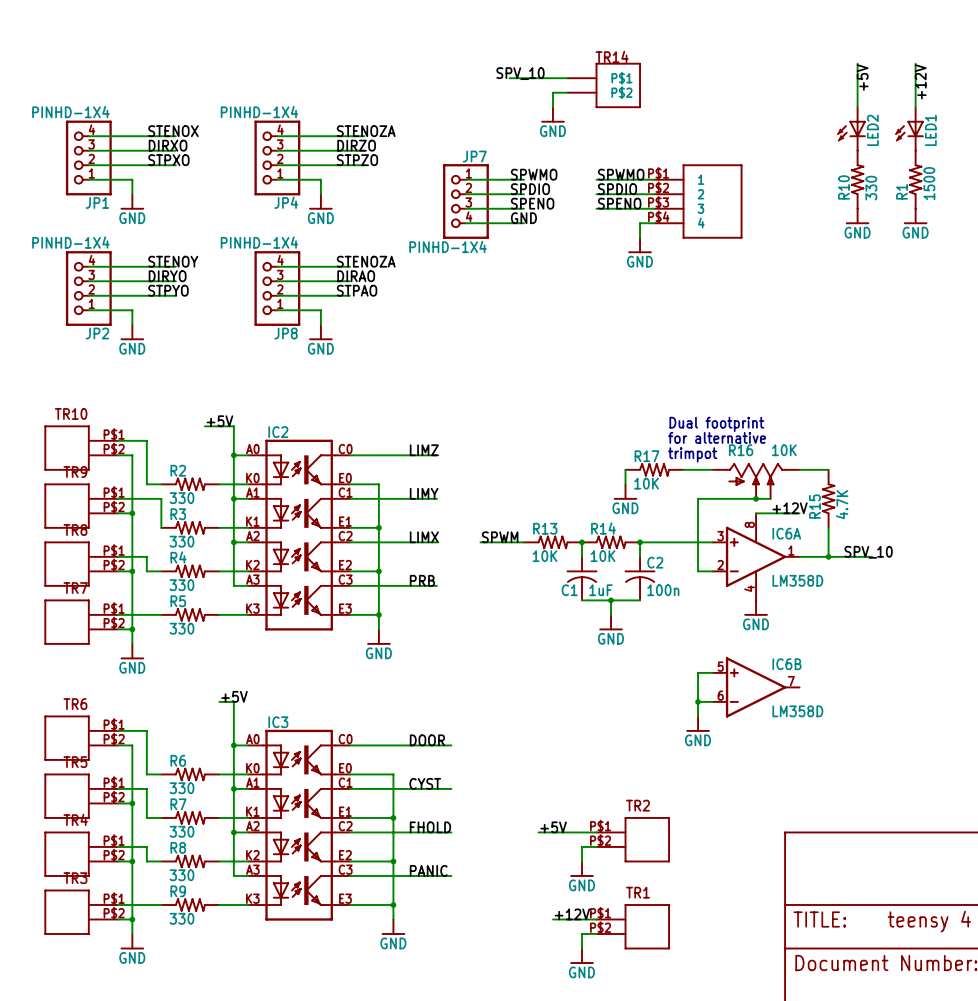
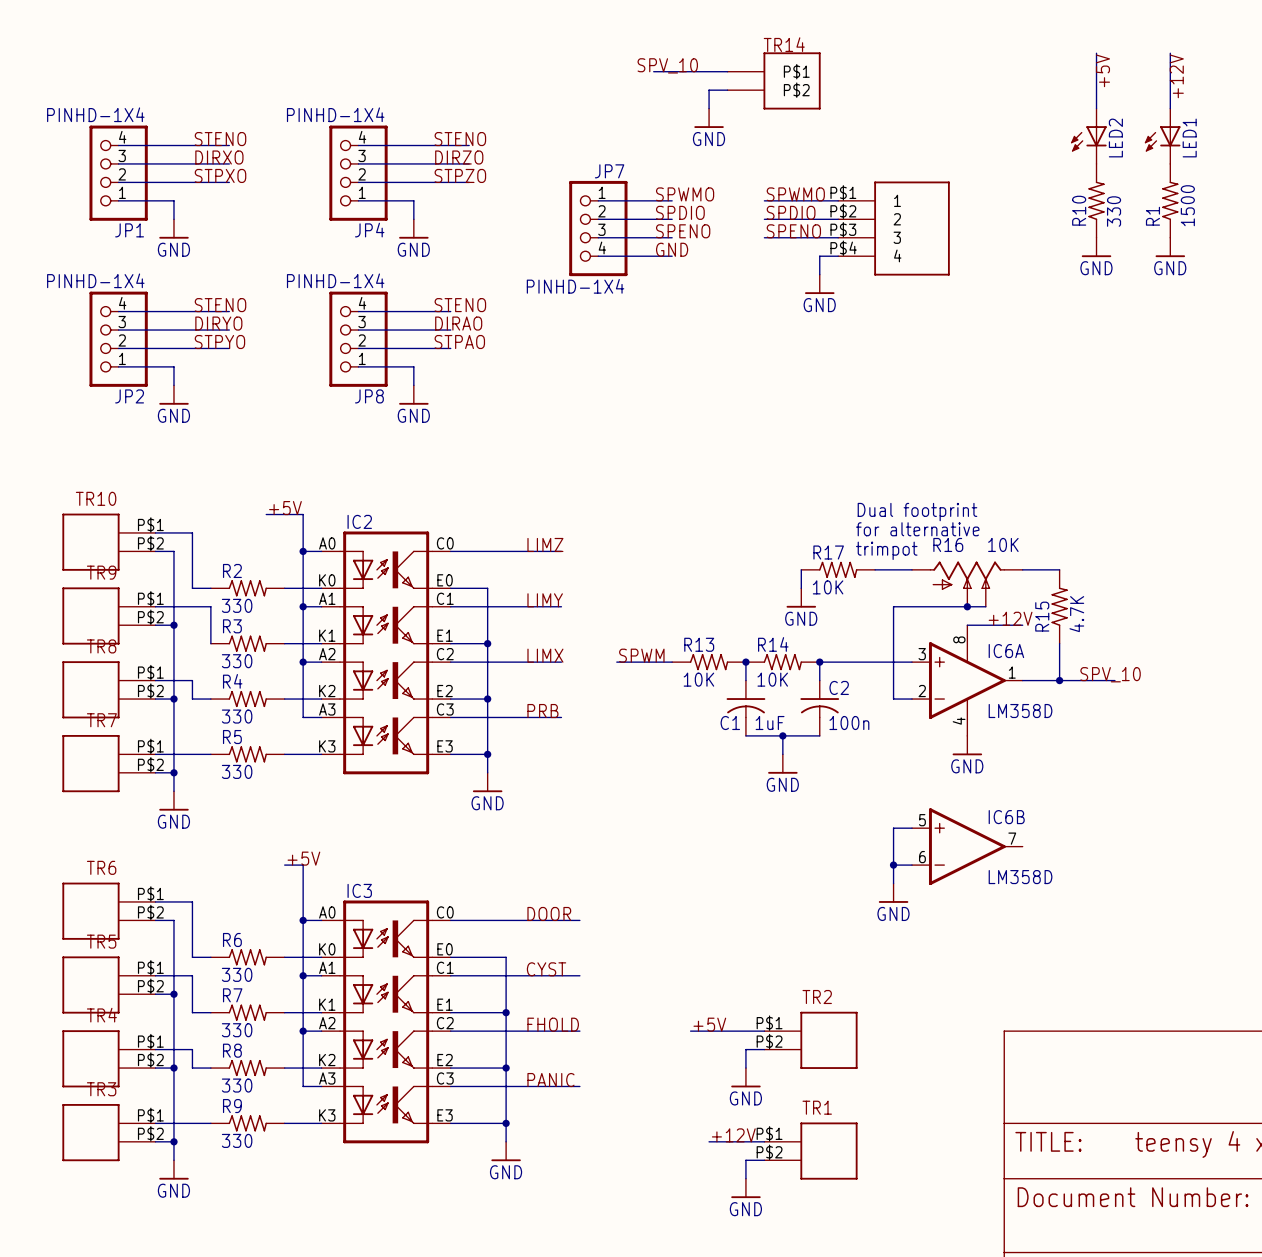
label: STENOX (173, 131) -> STENO (220, 139)
label: STENOZA (366, 131) -> STENO (460, 139)
label: STENOY (173, 261) -> STENO (220, 305)
label: STENOZA (366, 261) -> STENO (460, 305)

